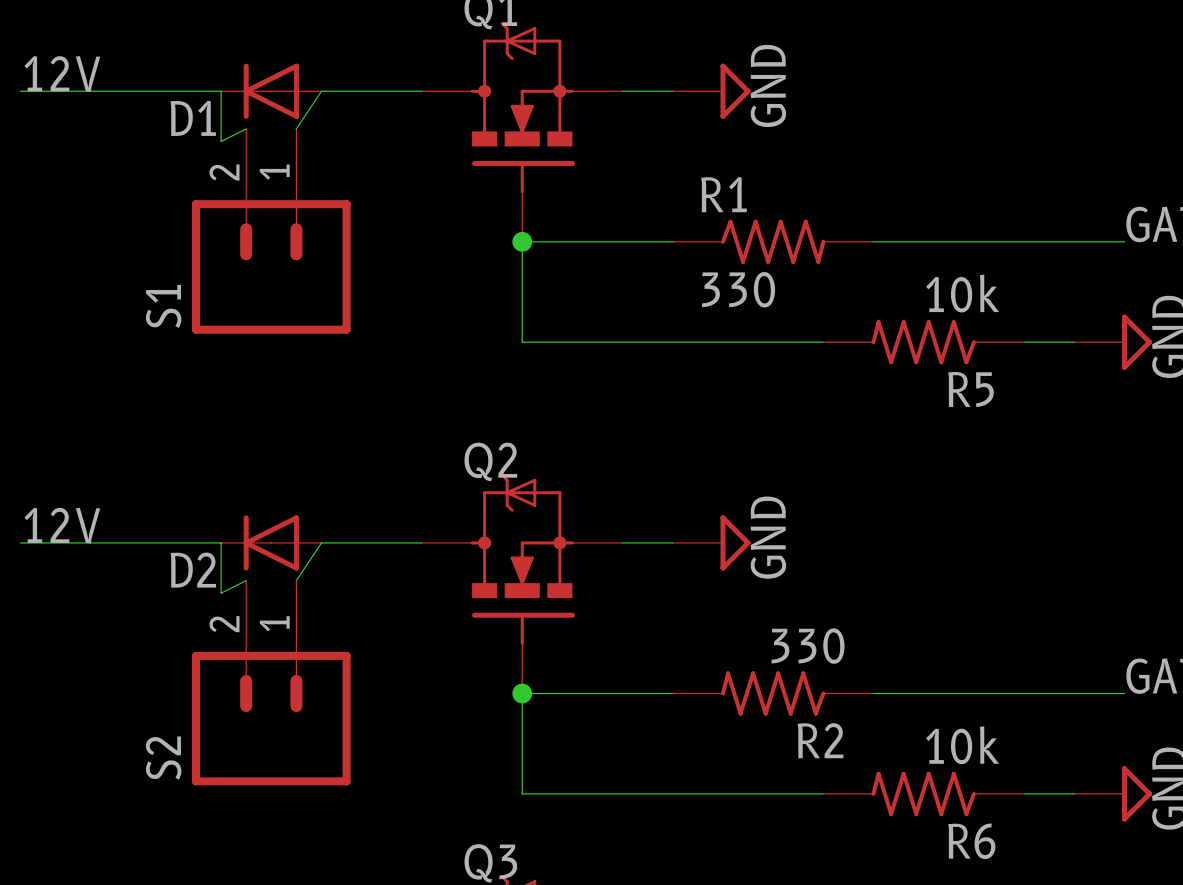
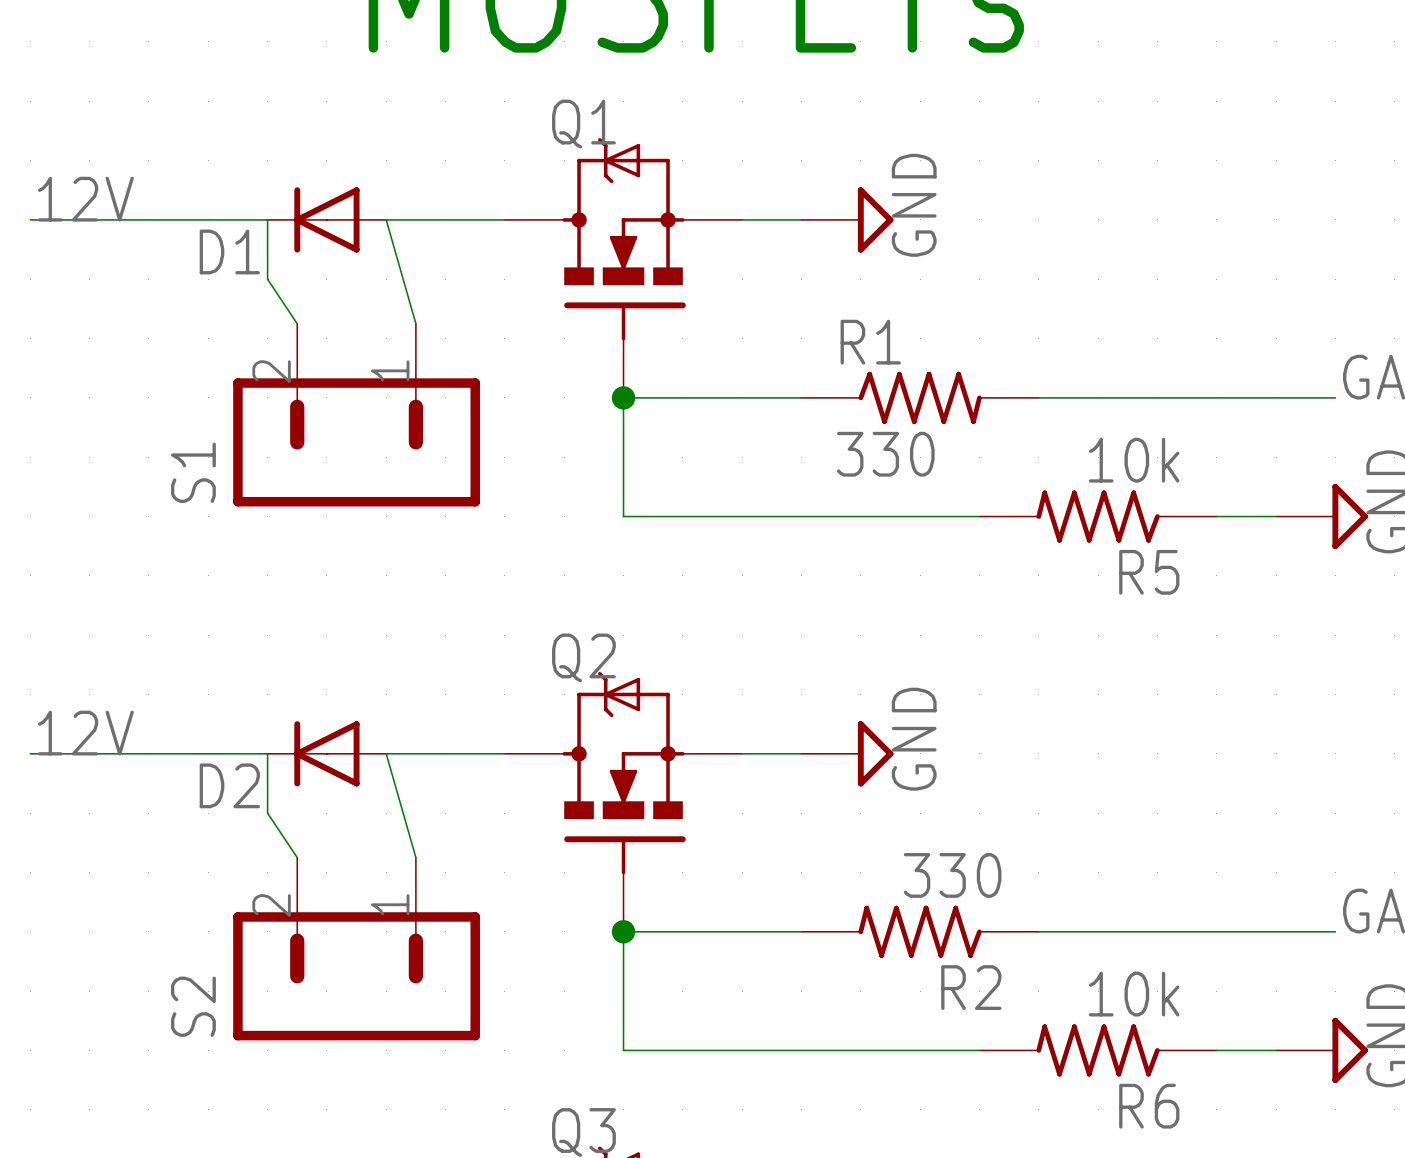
wire: (321, 91) (296, 128) -> (386, 219) (415, 323)
S1 symbol: [192, 128, 351, 334] -> [233, 323, 480, 507]
wire: (246, 128) (221, 141) -> (297, 323) (267, 279)
wire: (321, 542) (296, 580) -> (386, 753) (415, 857)
S2 symbol: [192, 580, 351, 786] -> [233, 857, 480, 1041]
wire: (246, 580) (221, 593) -> (297, 857) (267, 813)

